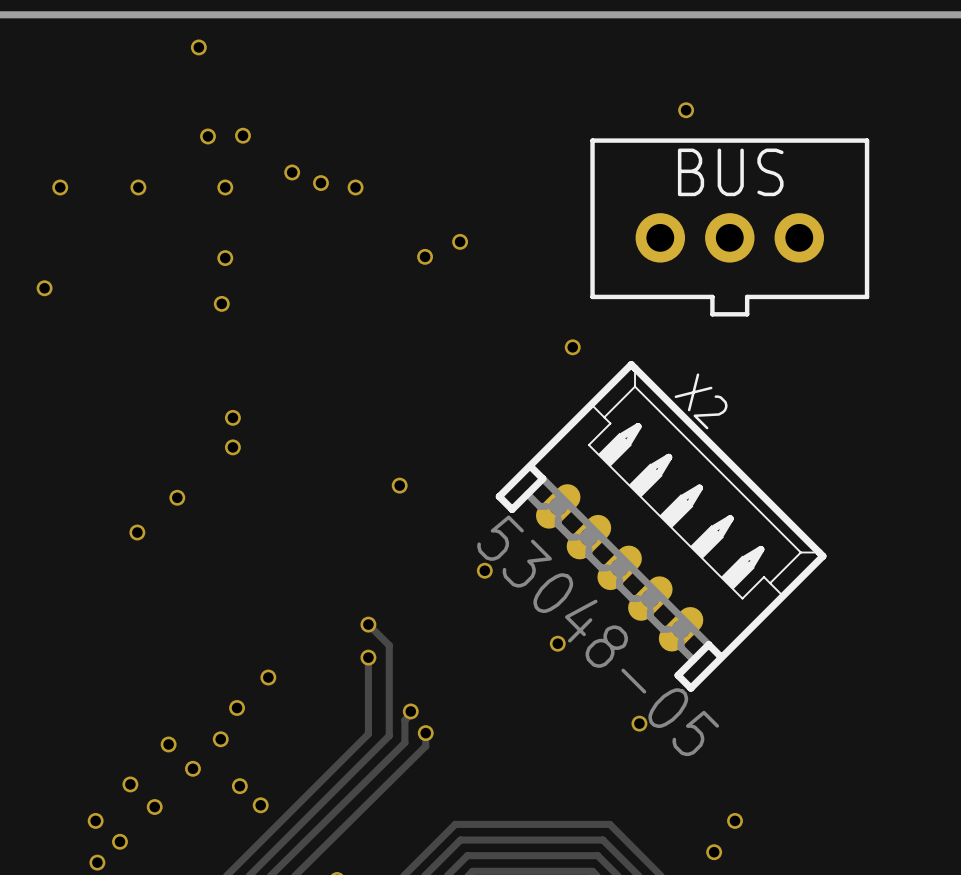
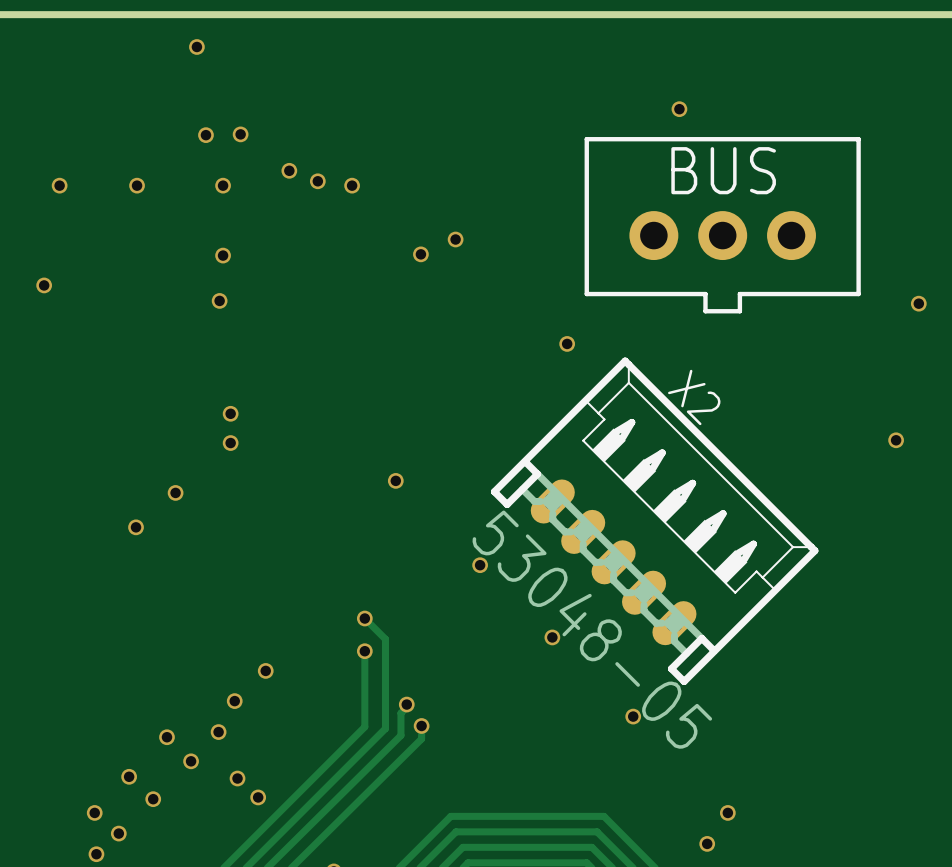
via: none -> (918, 303)
via: none -> (896, 440)

